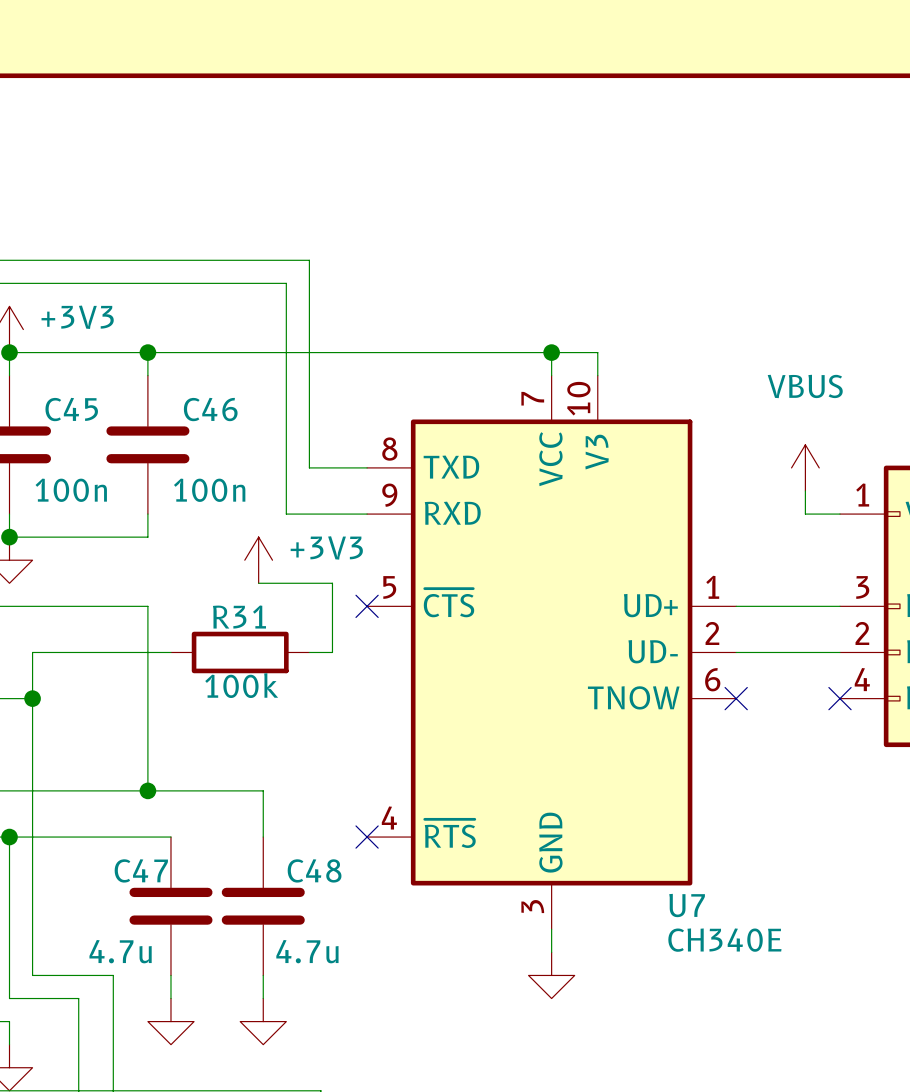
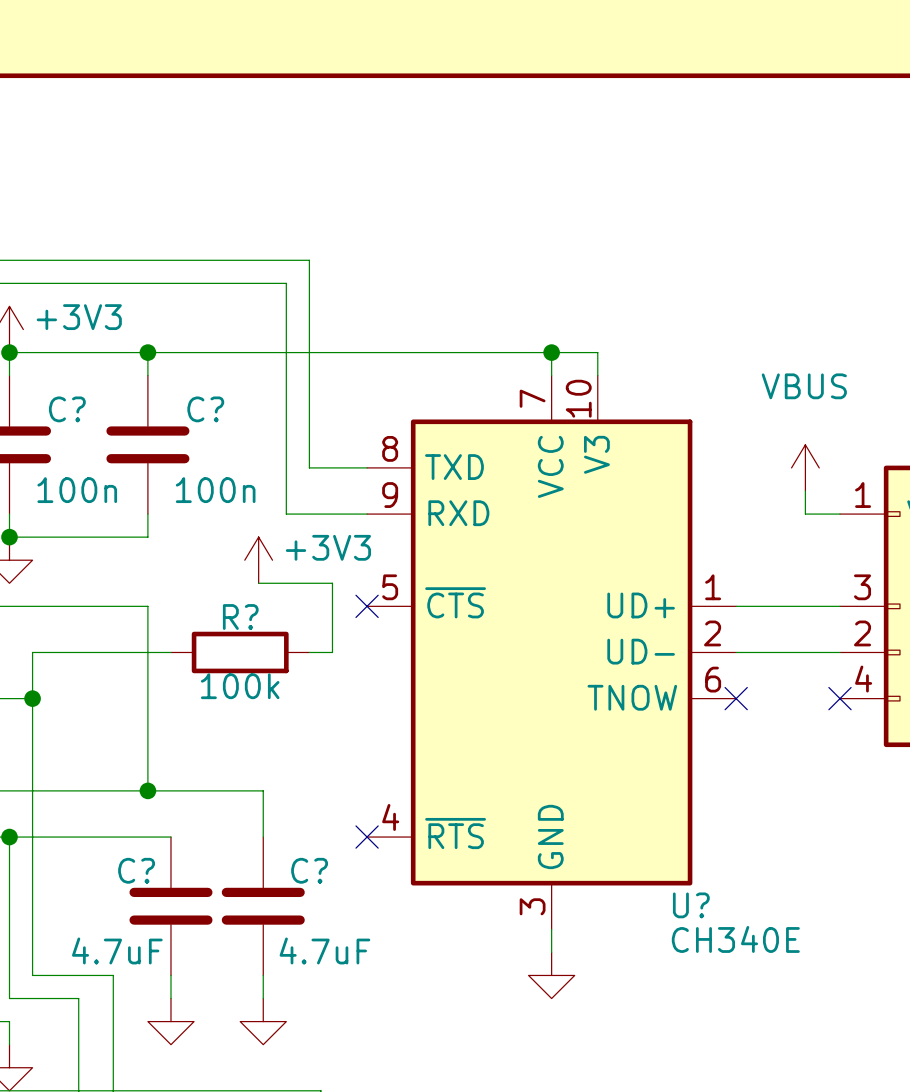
C45 name: C45 (71, 409) -> C? (67, 409)
C46 name: C46 (210, 409) -> C? (205, 409)
R31 name: R31 (239, 617) -> R? (240, 617)
C47 name: C47 (141, 870) -> C? (136, 870)
C48 name: C48 (314, 870) -> C? (309, 870)
U7 name: U7 (687, 905) -> U? (691, 905)
C47 value: 4.7u (120, 951) -> 4.7uF (117, 950)
C48 value: 4.7u (307, 951) -> 4.7uF (324, 950)

